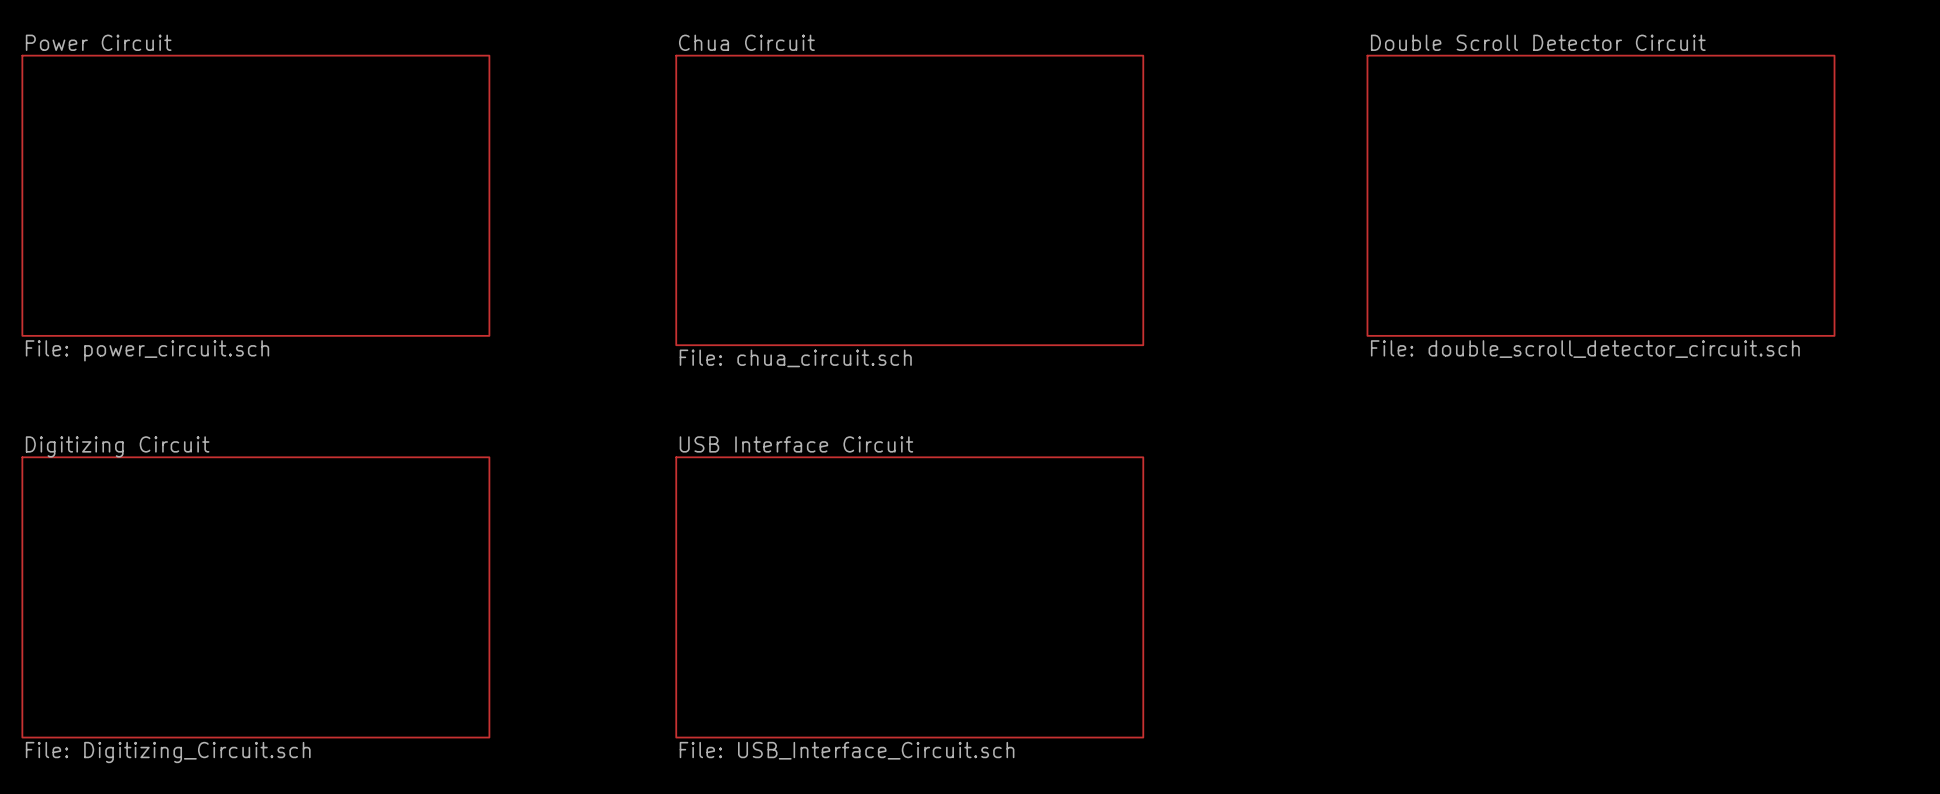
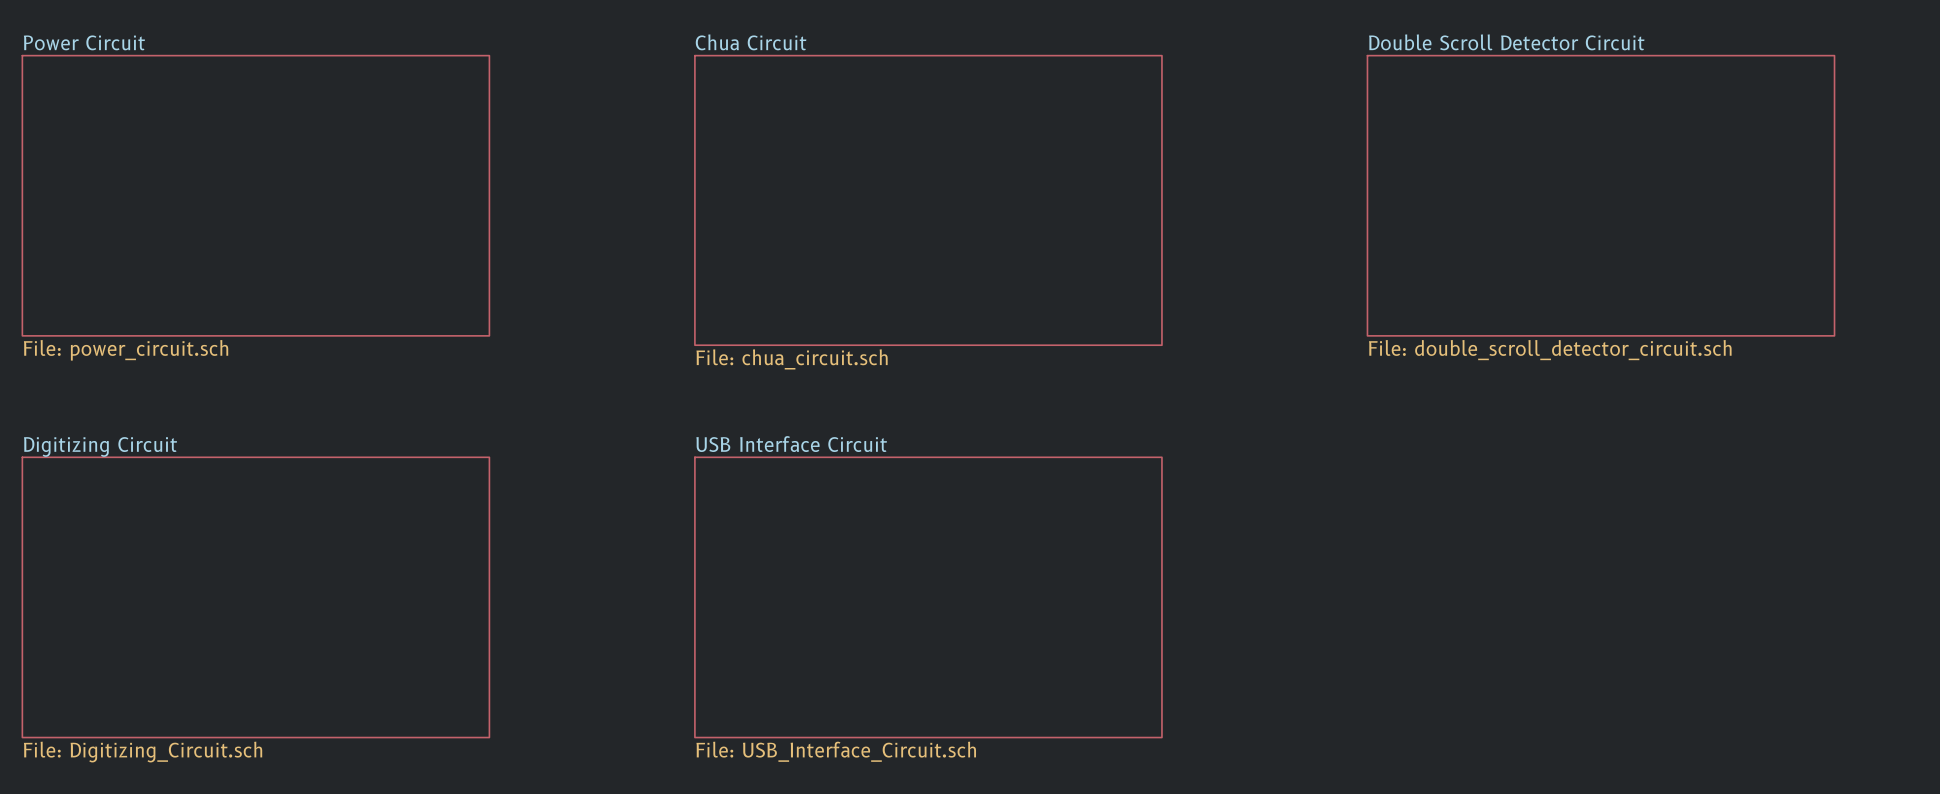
sheet Chua Circuit position: (909, 200) -> (928, 200)
sheet USB Interface Circuit position: (909, 597) -> (928, 597)

